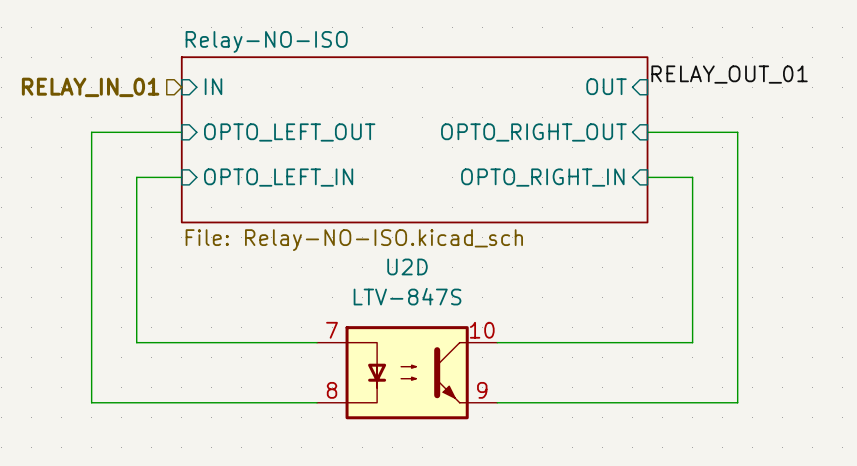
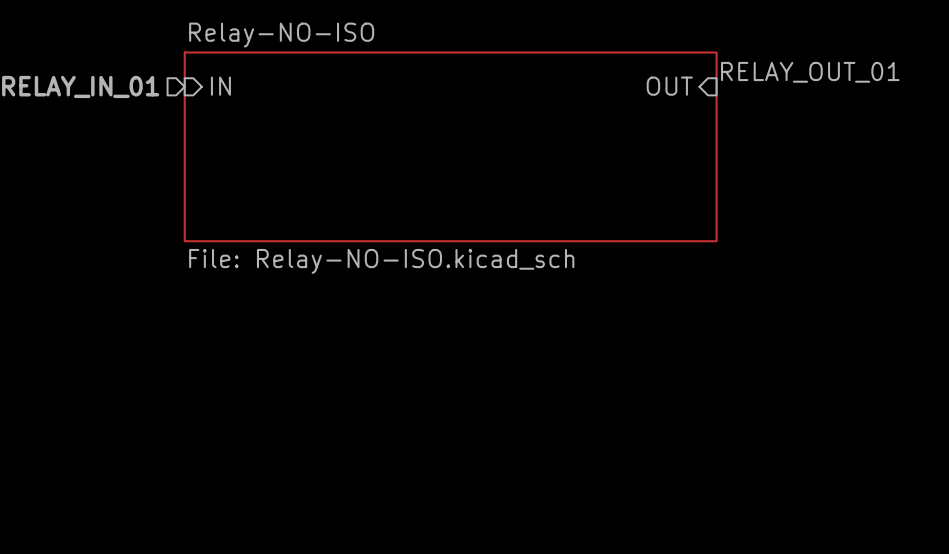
wire: (181, 132) (91, 132) (91, 402) (317, 402) -> none
sheet pin: OPTO_LEFT_OUT (289, 132) -> none
sheet pin: OPTO_RIGHT_OUT (533, 132) -> none
wire: (647, 132) (737, 132) (737, 402) (497, 402) -> none
wire: (181, 177) (136, 177) (136, 342) (317, 342) -> none
sheet pin: OPTO_LEFT_IN (278, 177) -> none
sheet pin: OPTO_RIGHT_IN (542, 177) -> none
wire: (647, 177) (692, 177) (692, 342) (497, 342) -> none
U2D: LTV-847S (407, 372) -> none

